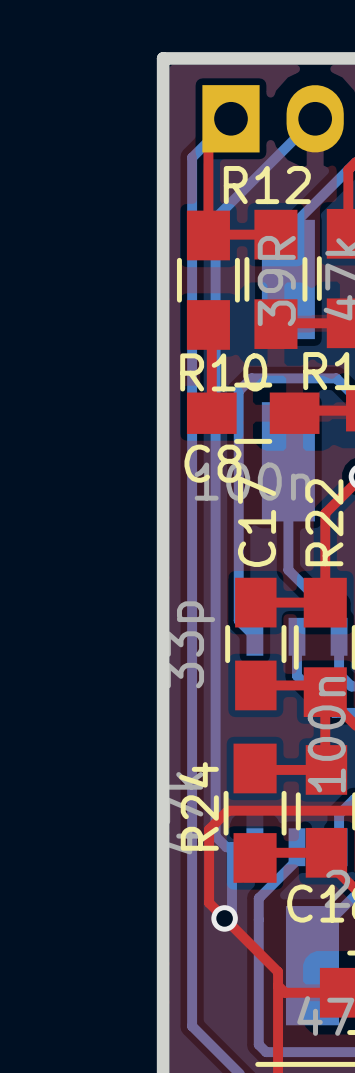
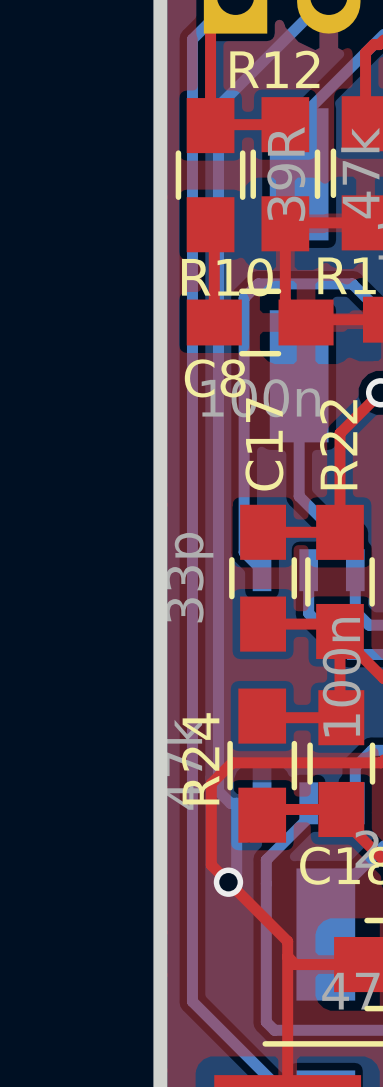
top track: none -> (285, 223) (285, 301) (306, 322)

